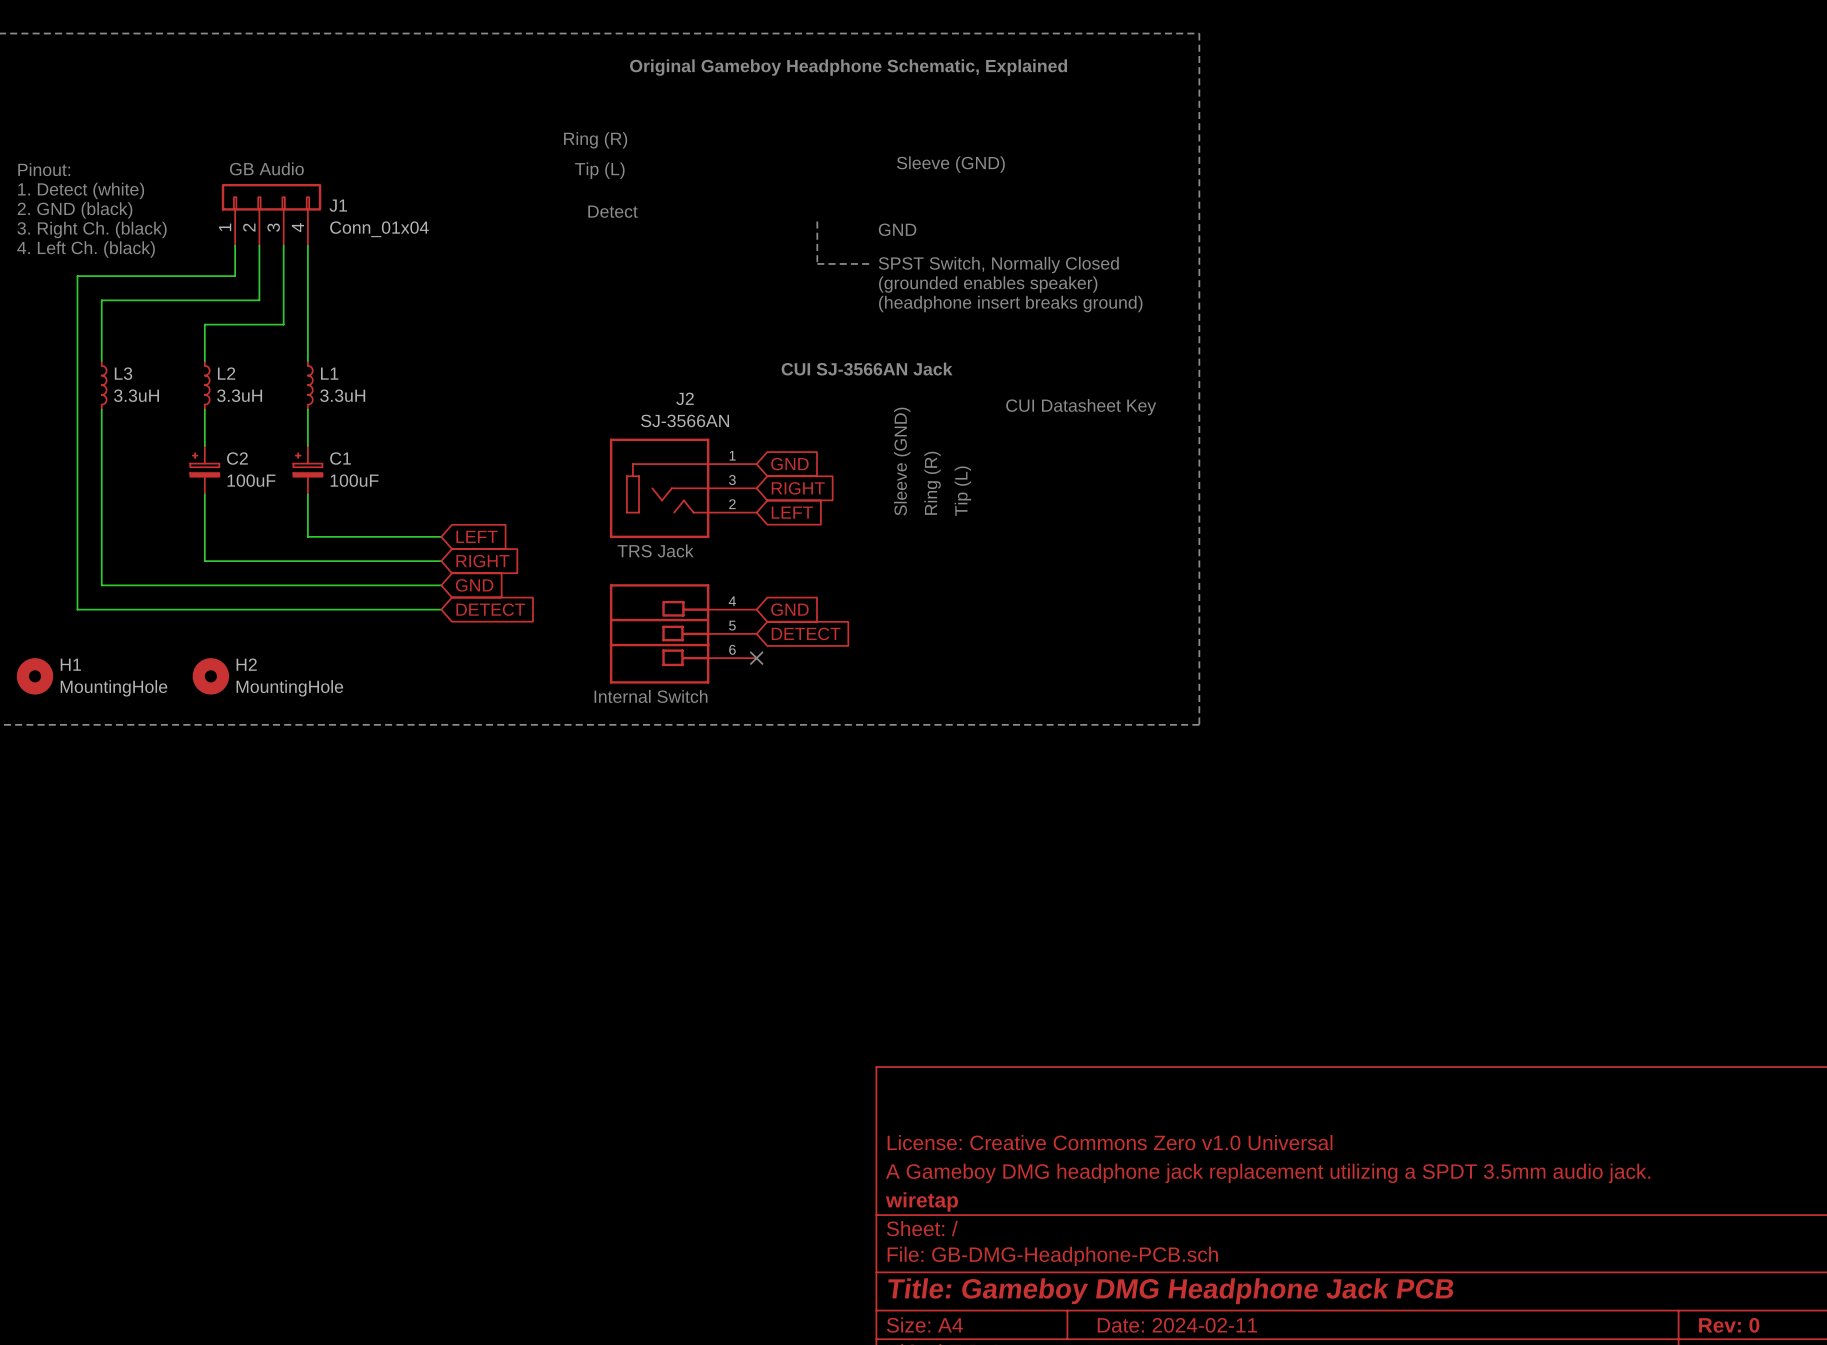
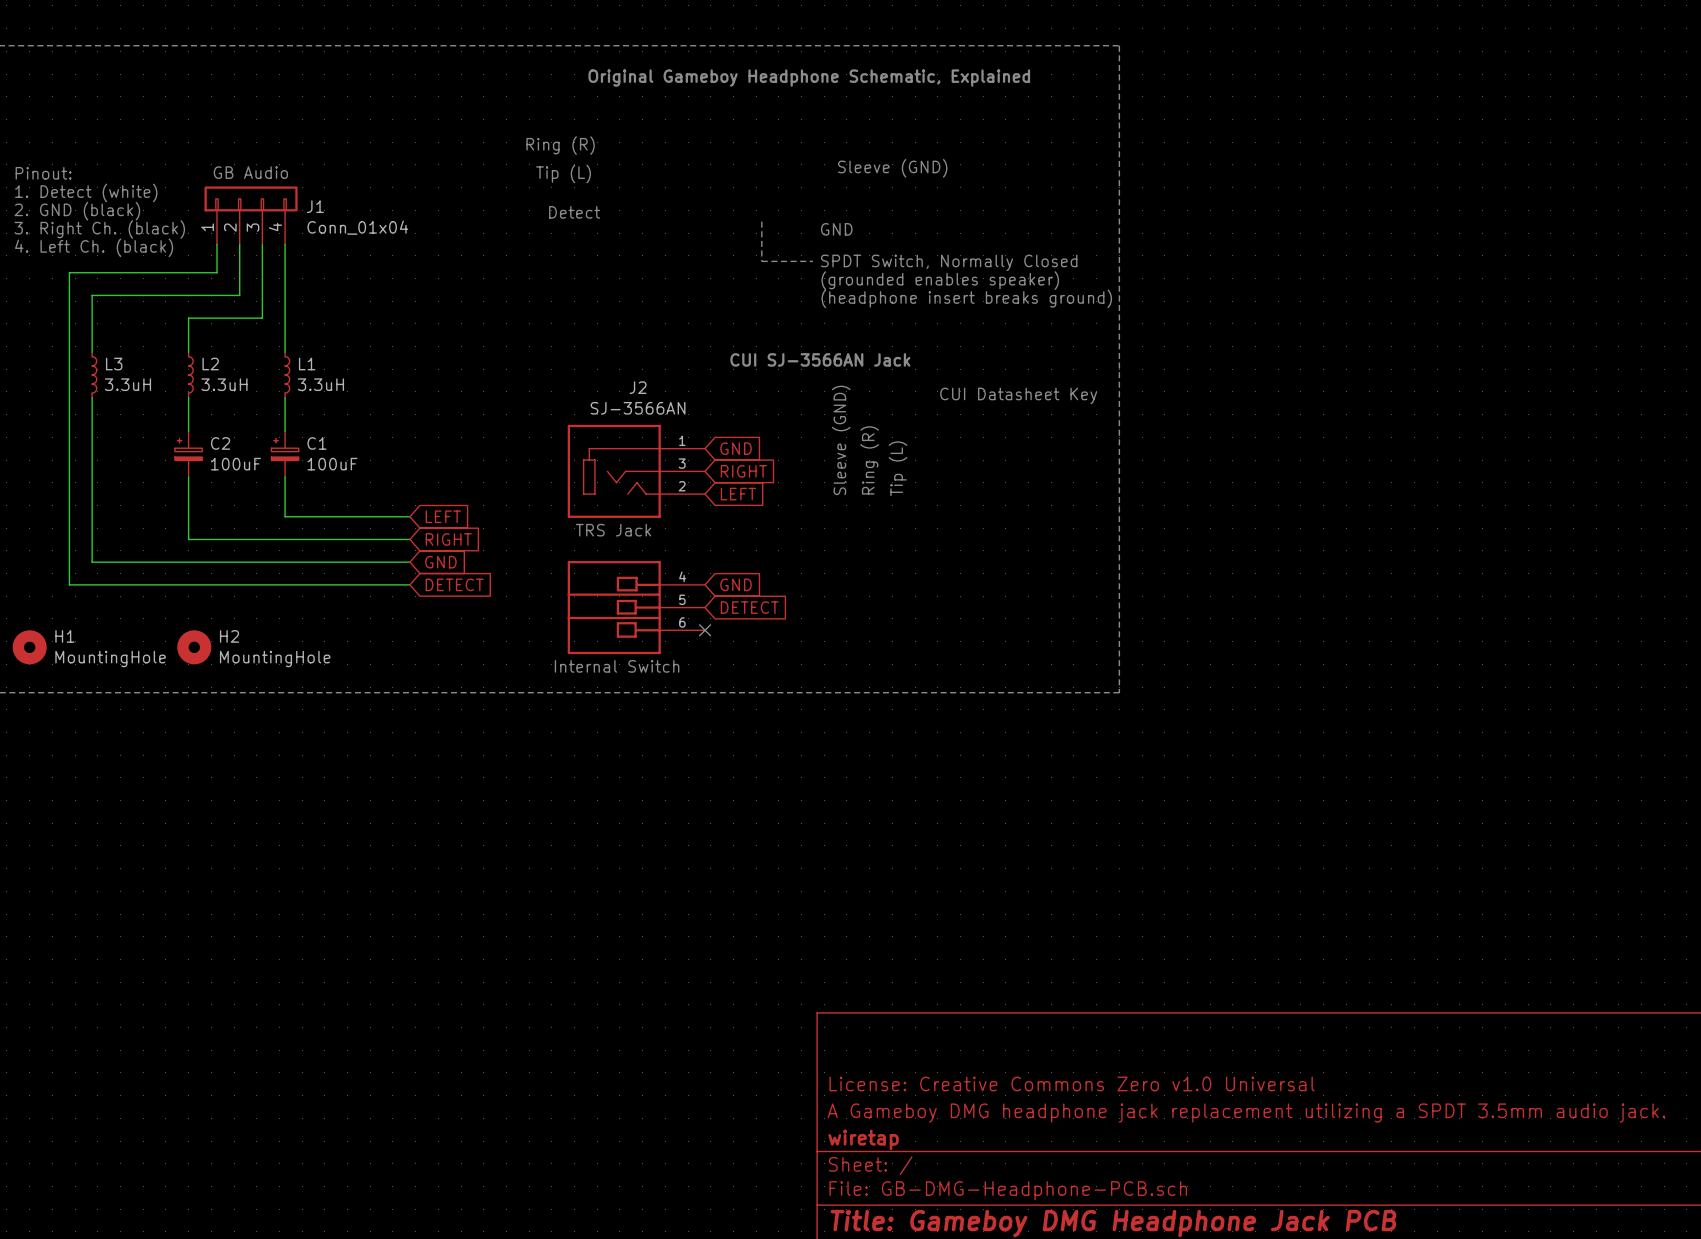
text: SPST Switch, Normally Closed (998, 265) -> SPDT Switch, Normally Closed (949, 262)

